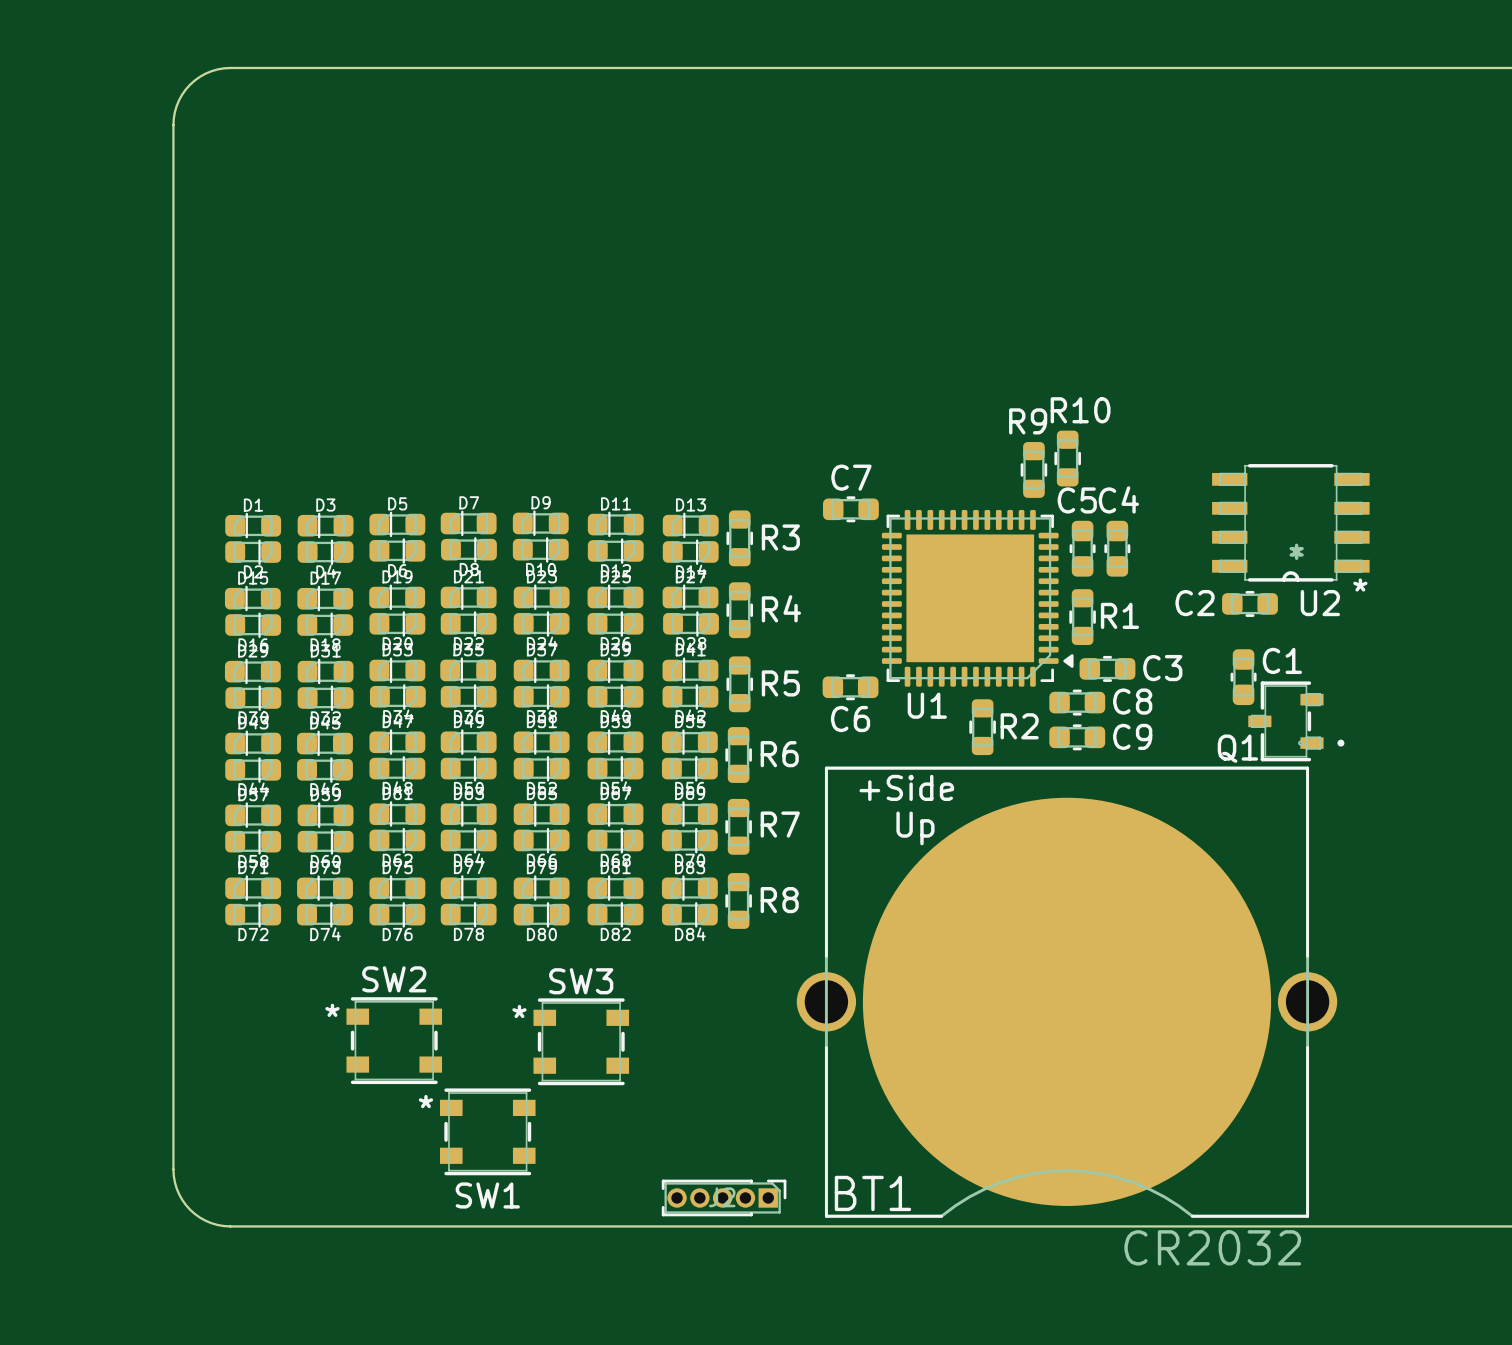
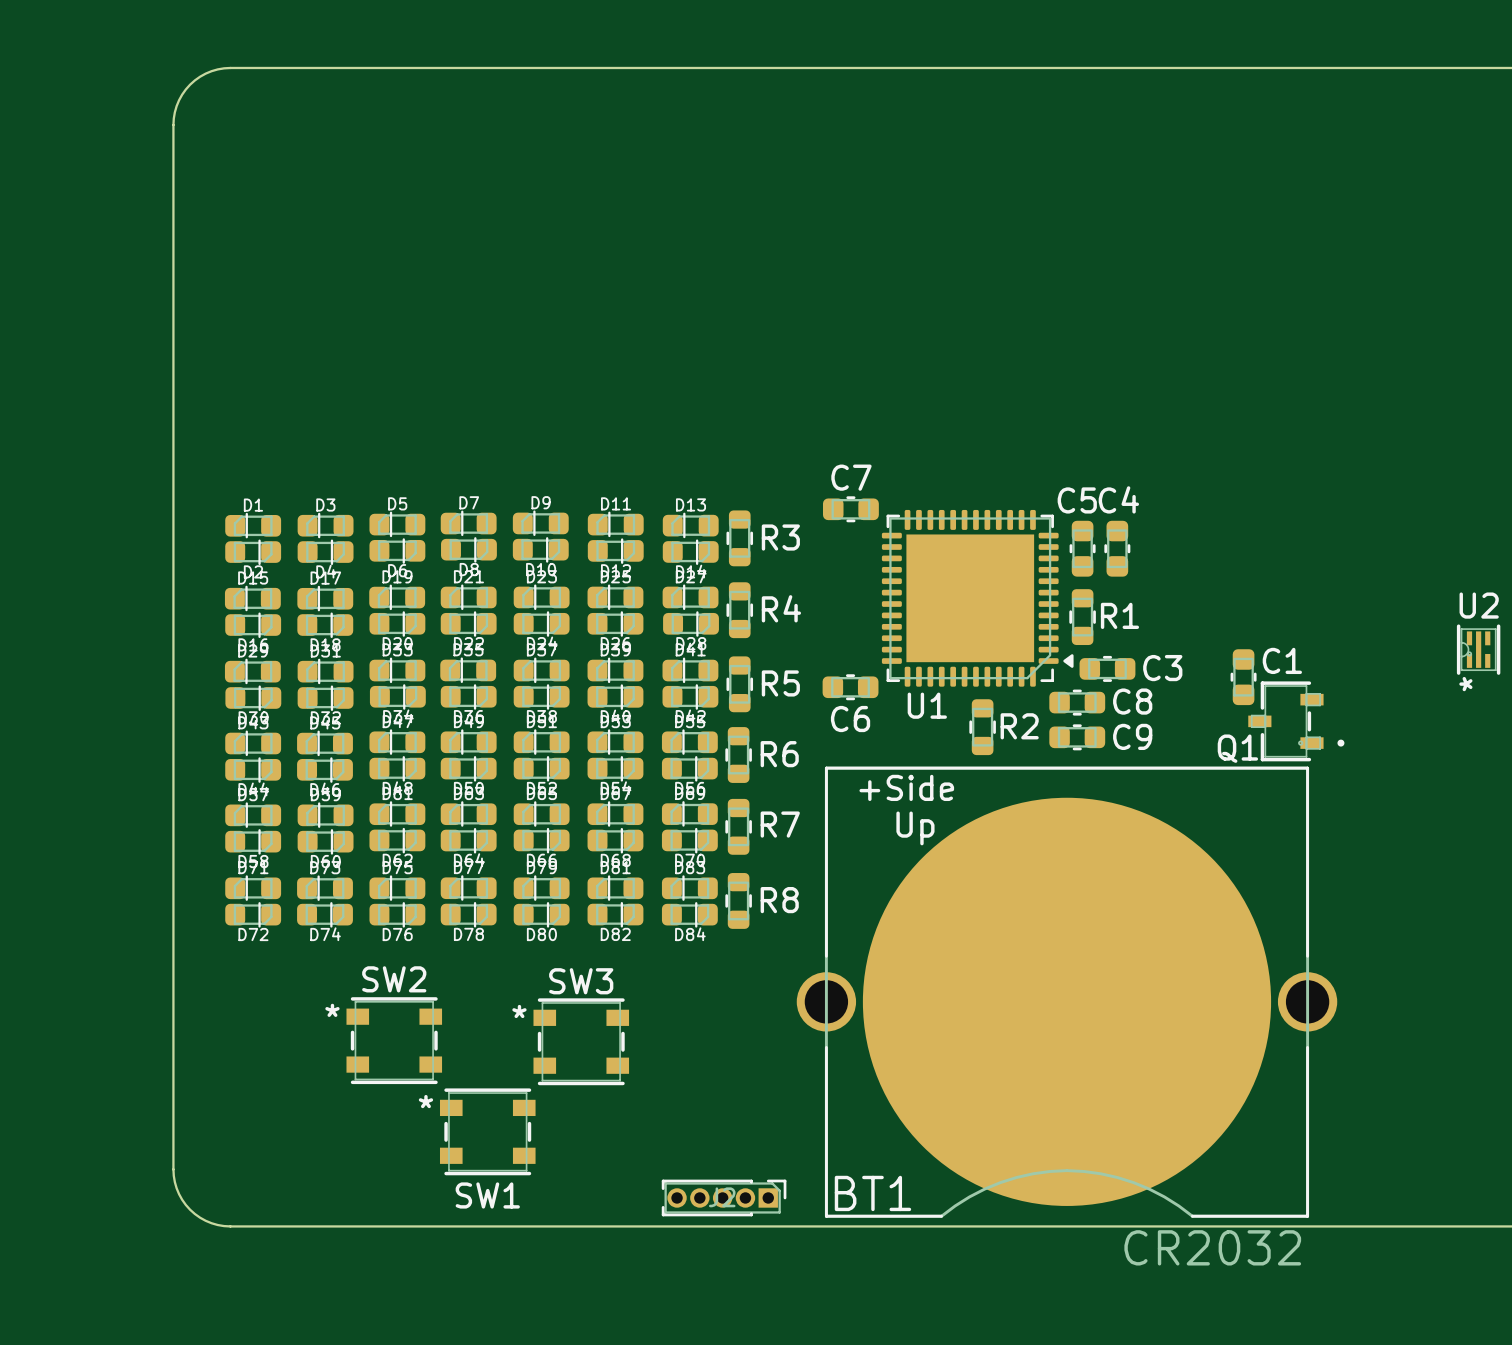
R10: (1067, 458) -> none
U2 footprint: [1212, 464, 1370, 582] -> [1456, 624, 1501, 675]
R9: (1033, 469) -> none
C2: (1250, 603) -> none
U2 name position: U2 (1320, 603) -> U2 (1479, 605)

